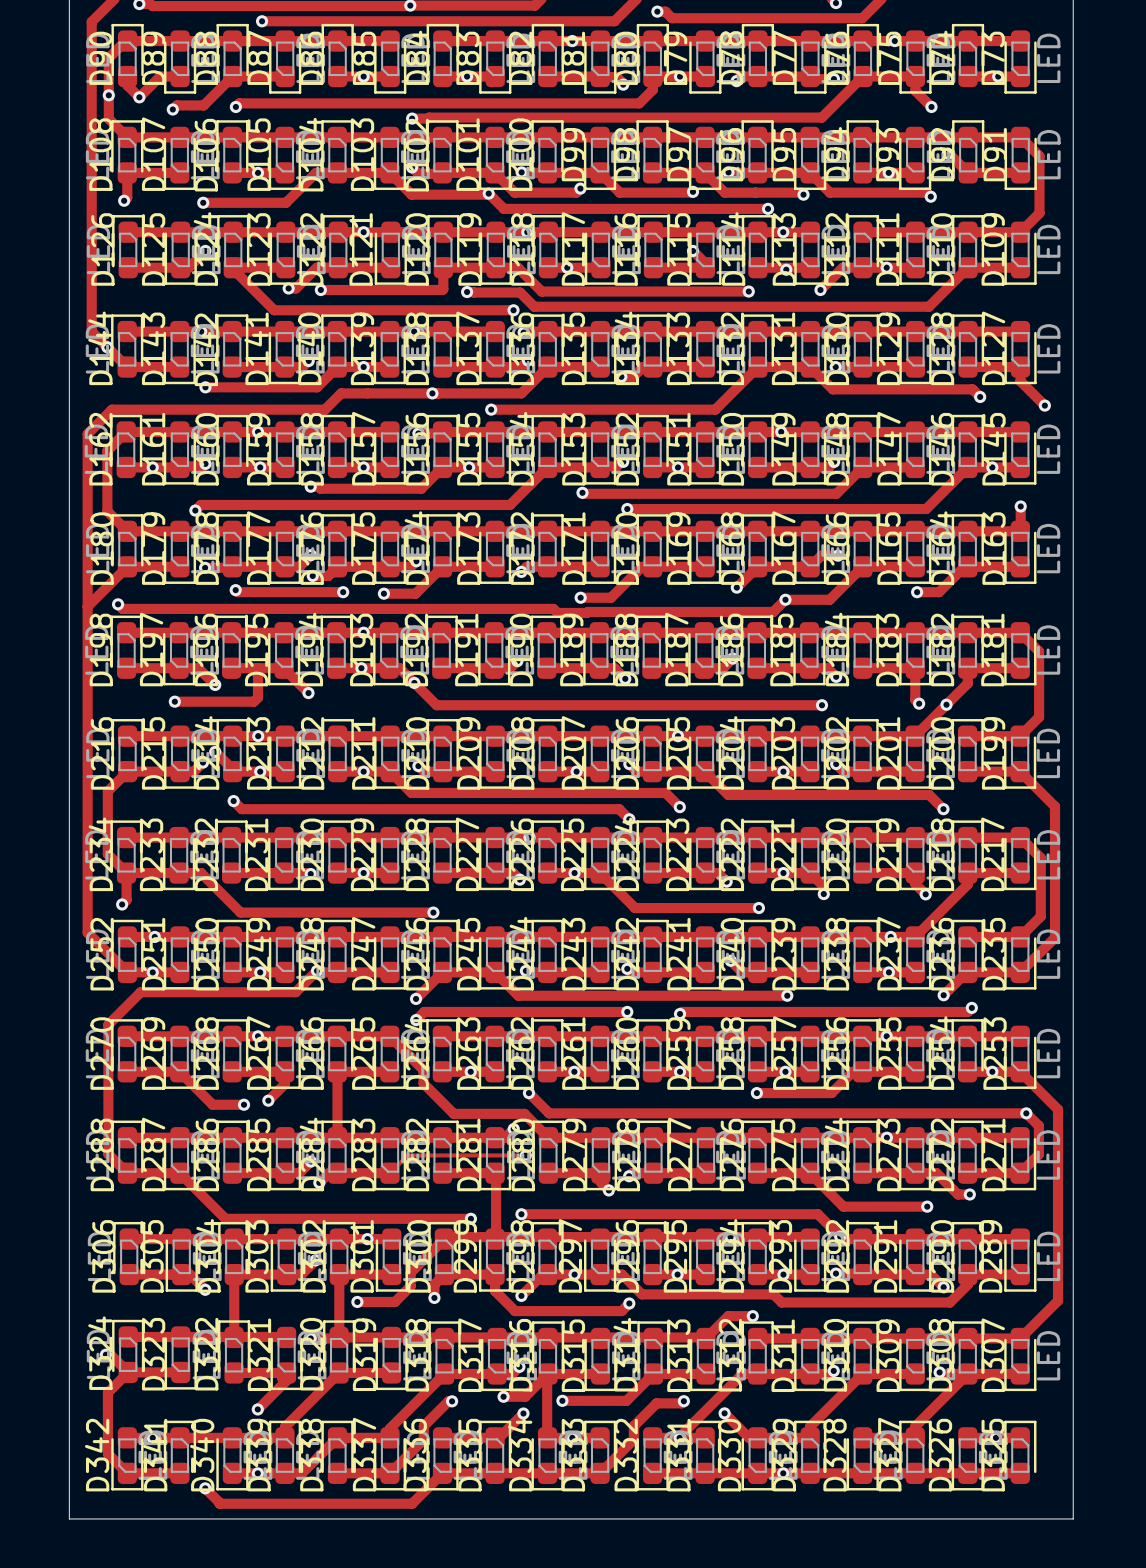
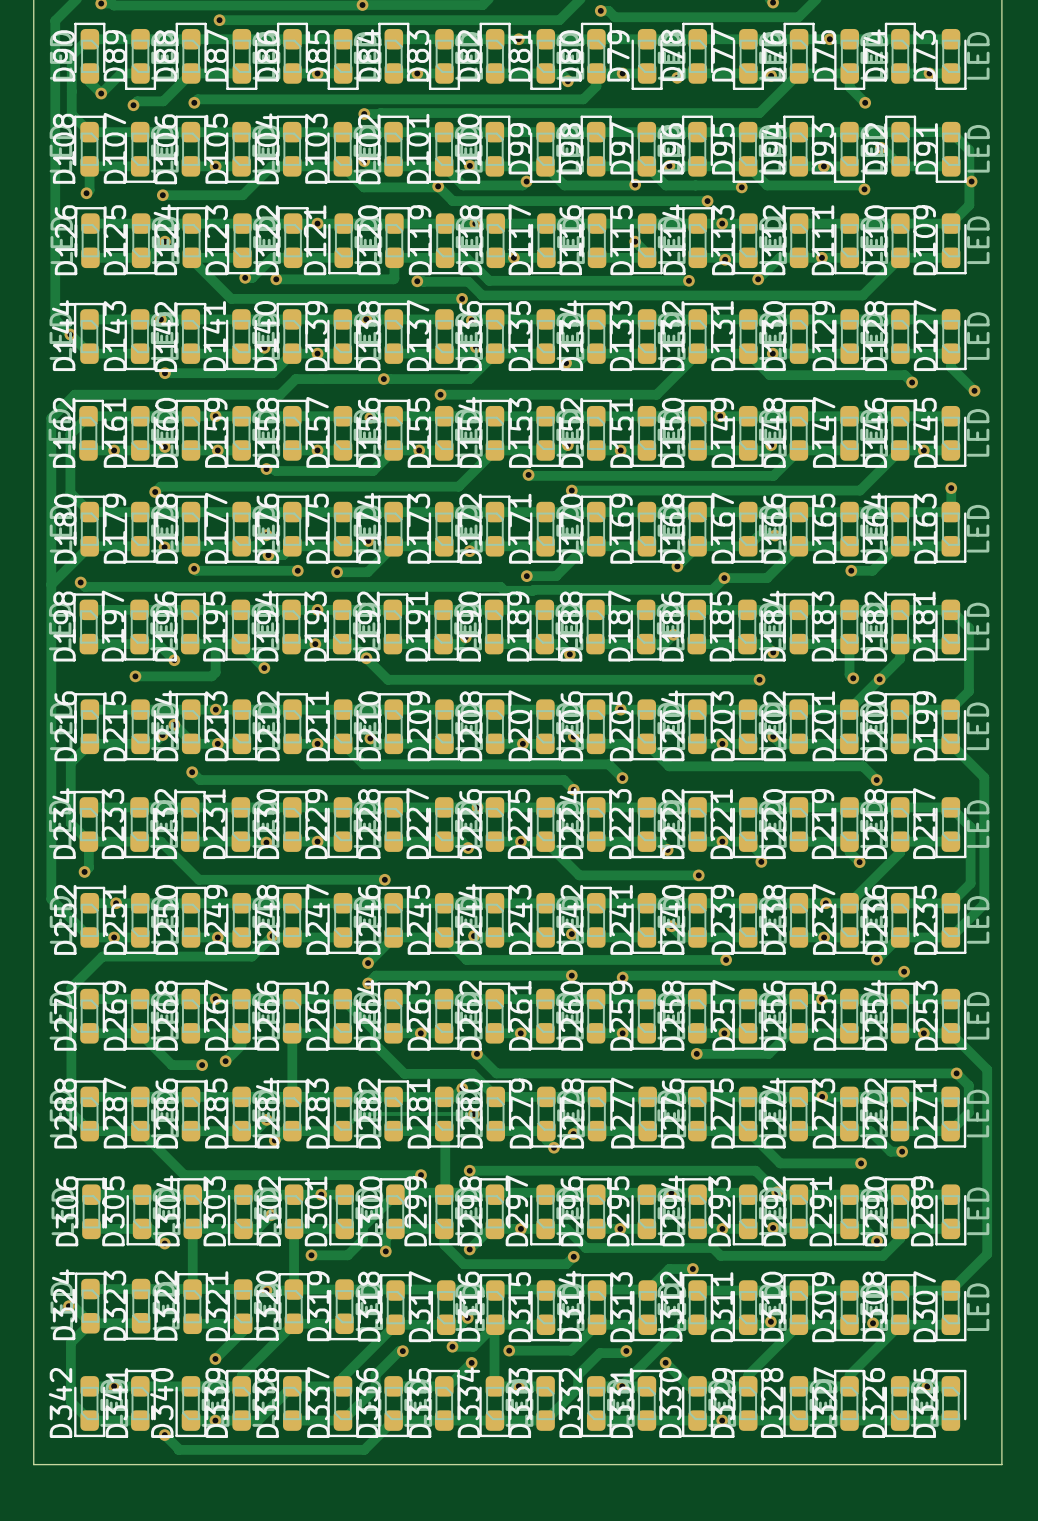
via: (108, 95) -> none
via: none -> (971, 181)

